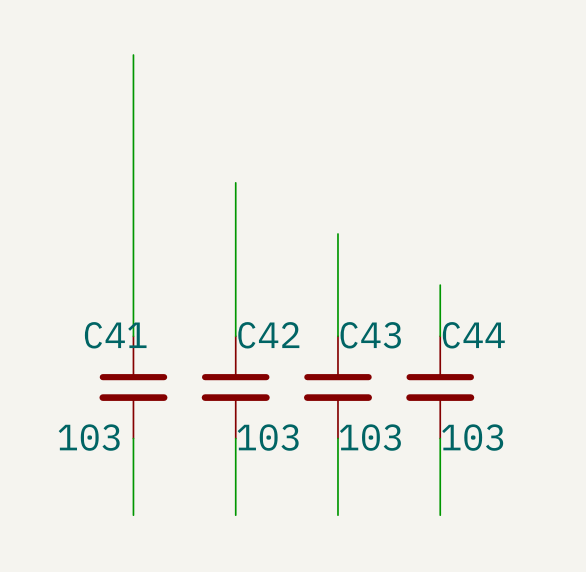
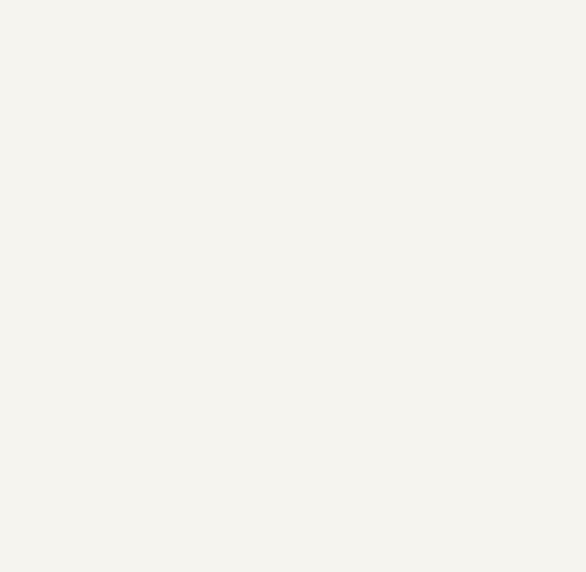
wire: (133, 55) (133, 336) -> none
wire: (235, 182) (235, 336) -> none
wire: (337, 233) (337, 336) -> none
wire: (440, 285) (440, 336) -> none
C41: 103 (133, 387) -> none
C42: 103 (235, 387) -> none
C43: 103 (337, 387) -> none
C44: 103 (440, 387) -> none
wire: (133, 438) (133, 515) -> none
wire: (235, 438) (235, 515) -> none
wire: (337, 438) (337, 515) -> none
wire: (440, 438) (440, 515) -> none

